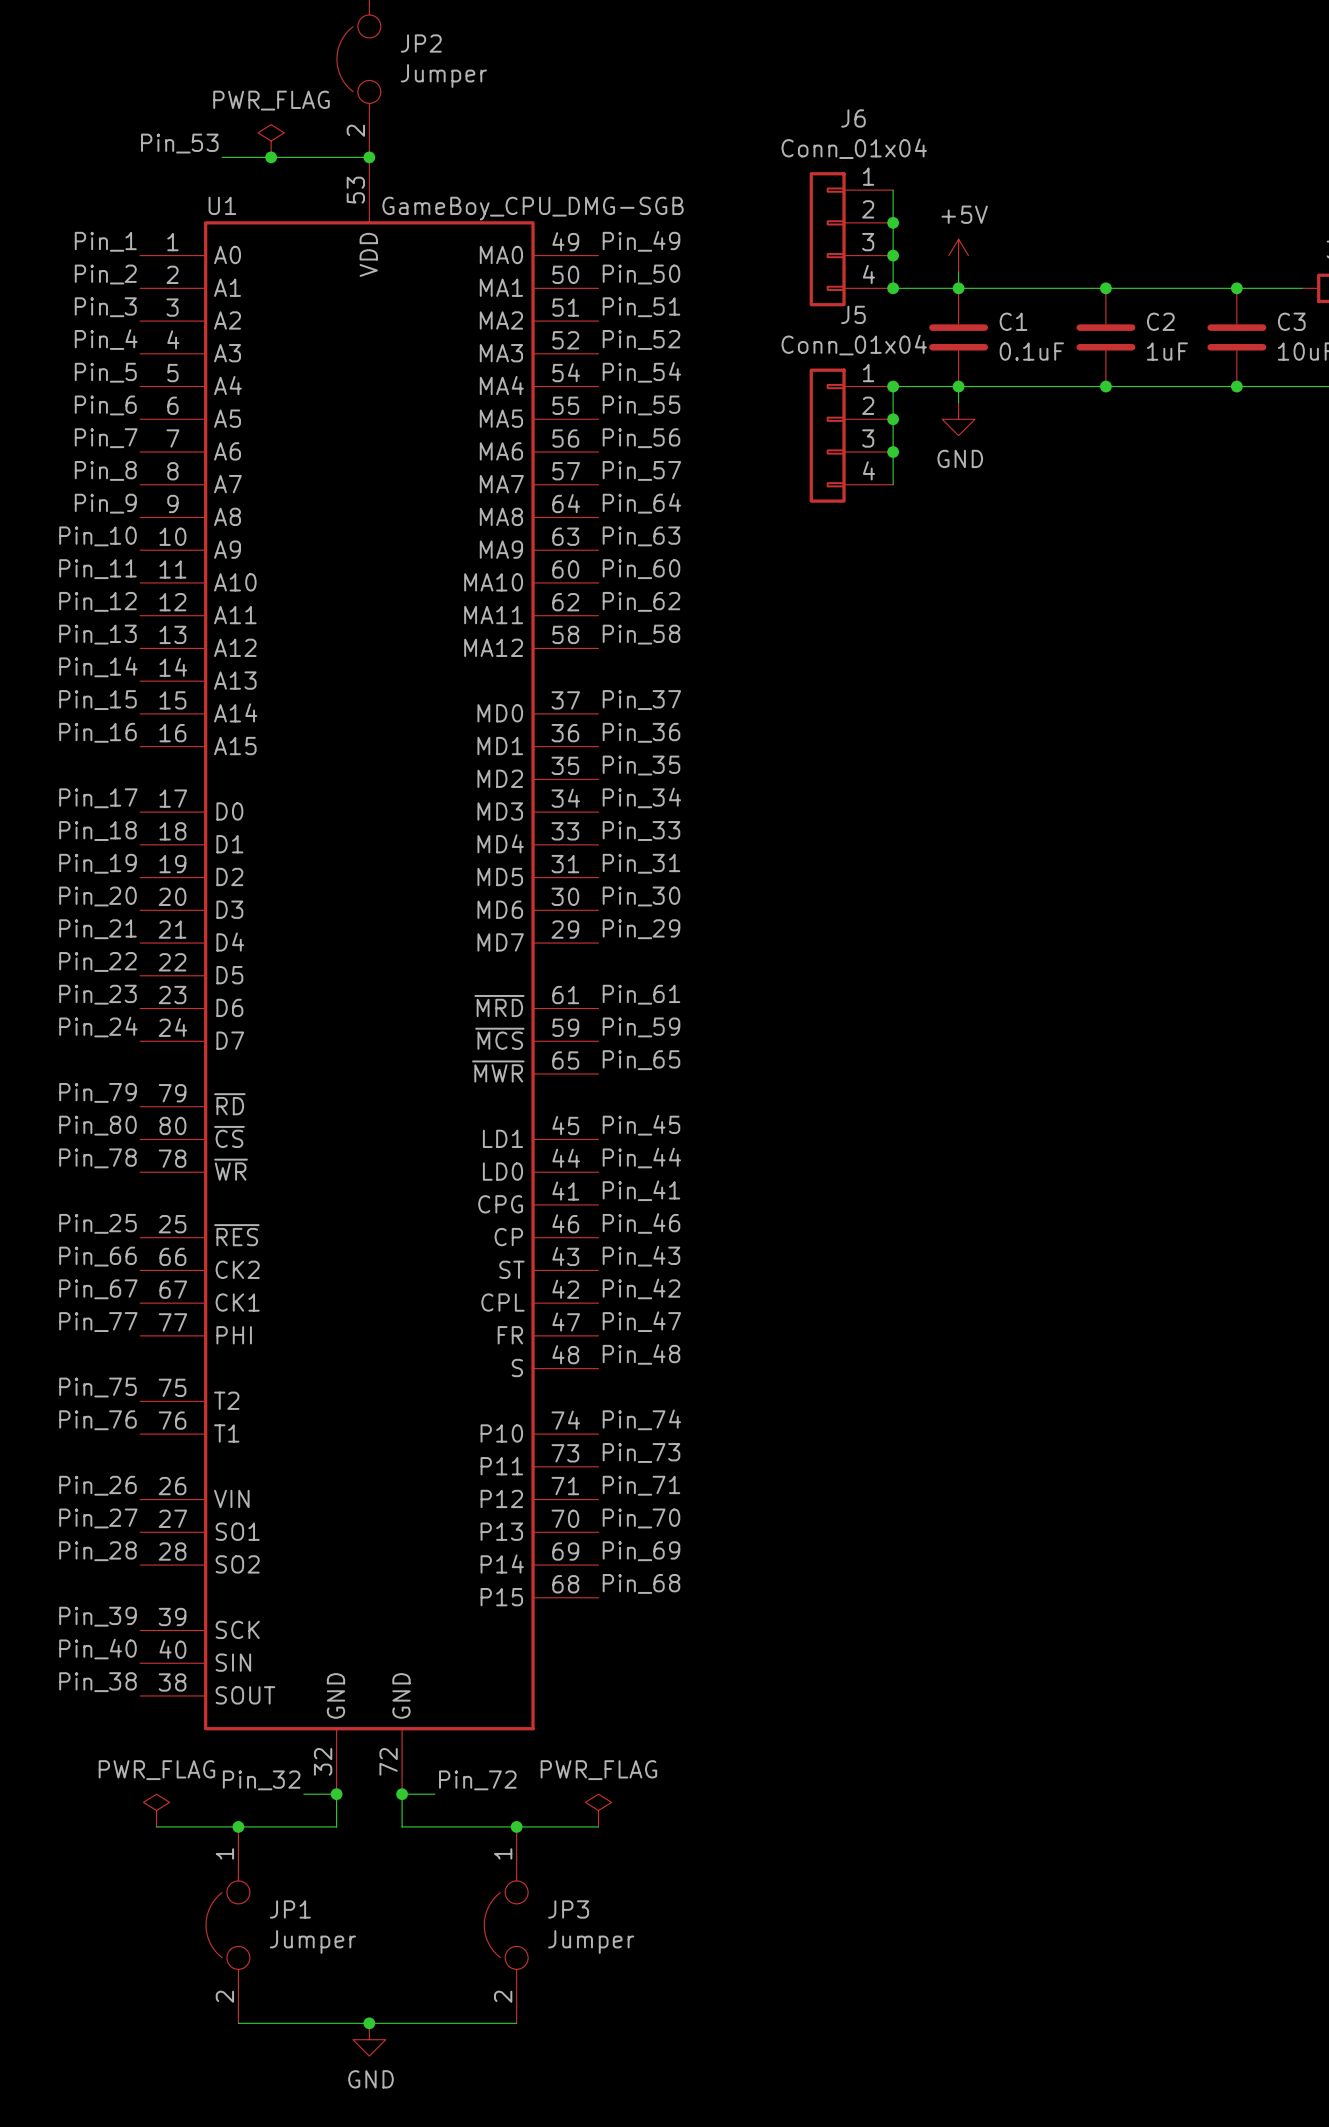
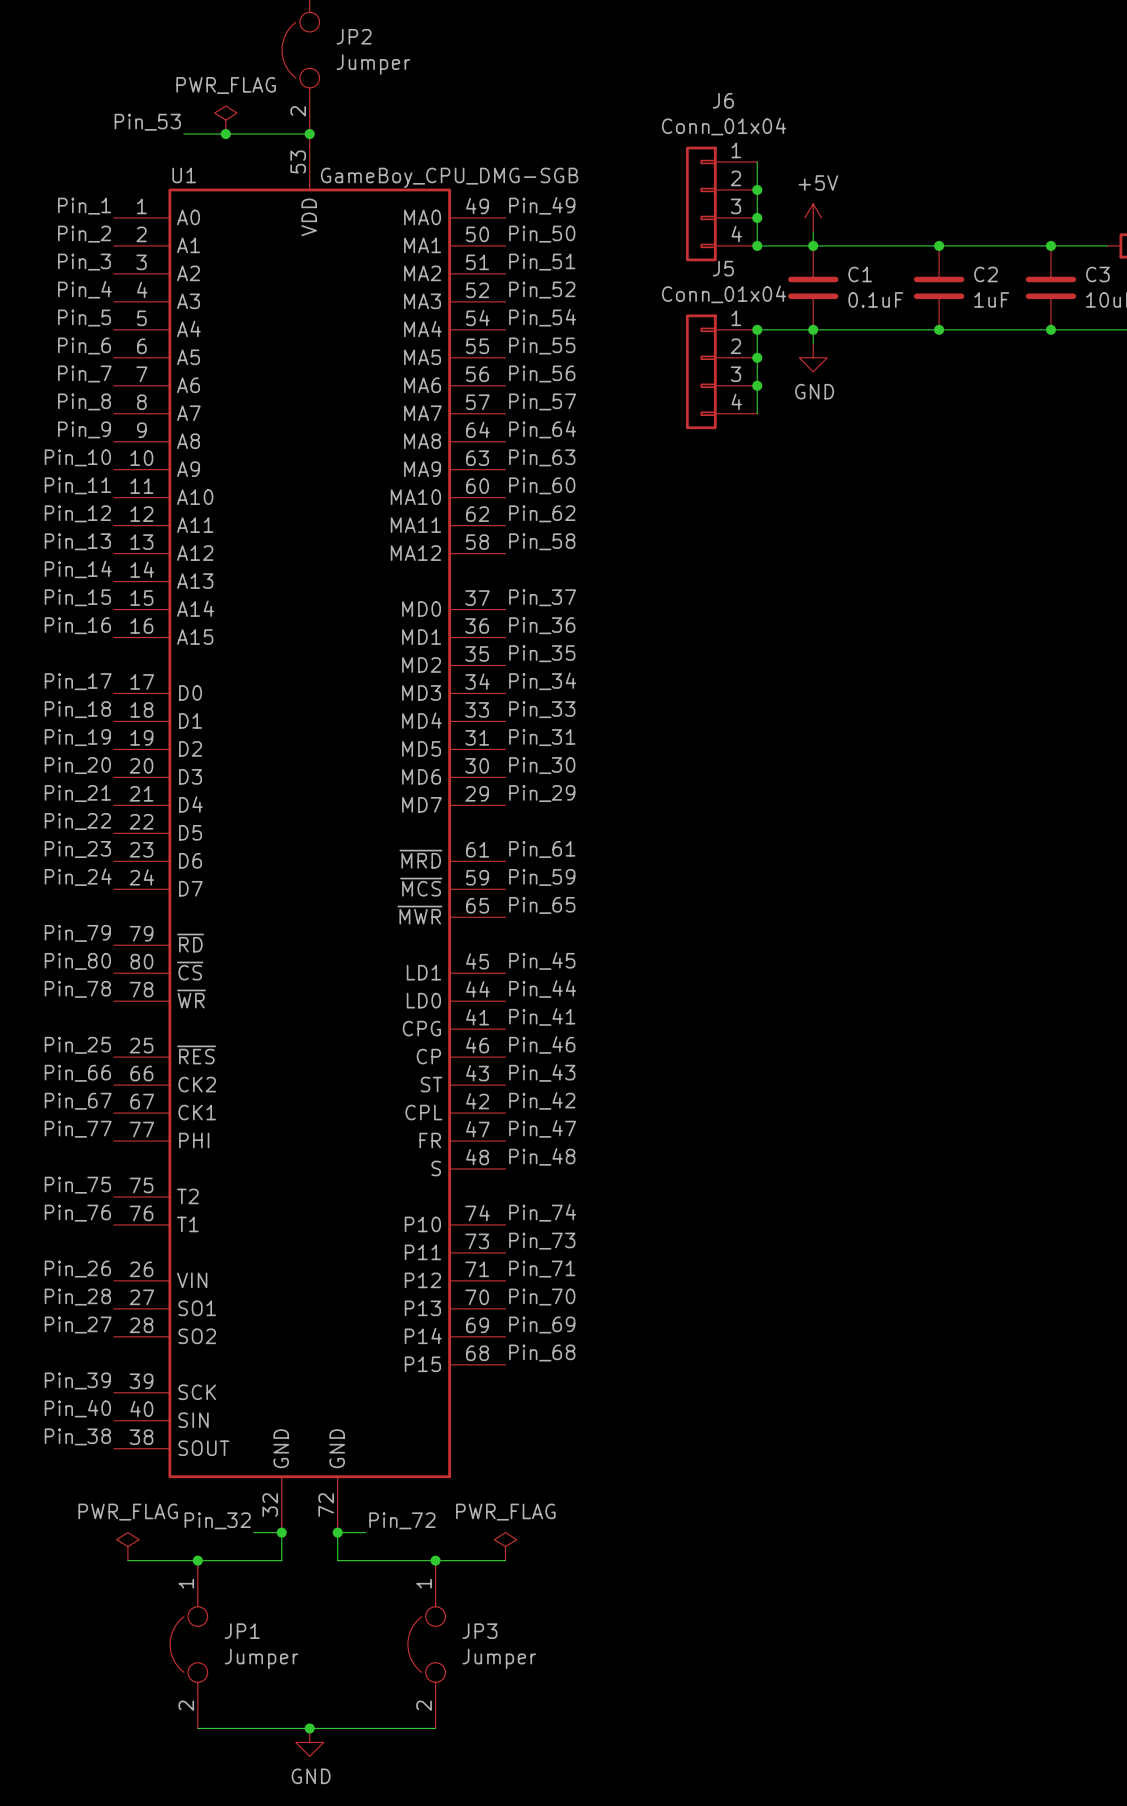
label: Pin_27 (98, 1518) -> Pin_28 (77, 1297)
label: Pin_28 (97, 1551) -> Pin_27 (78, 1325)

